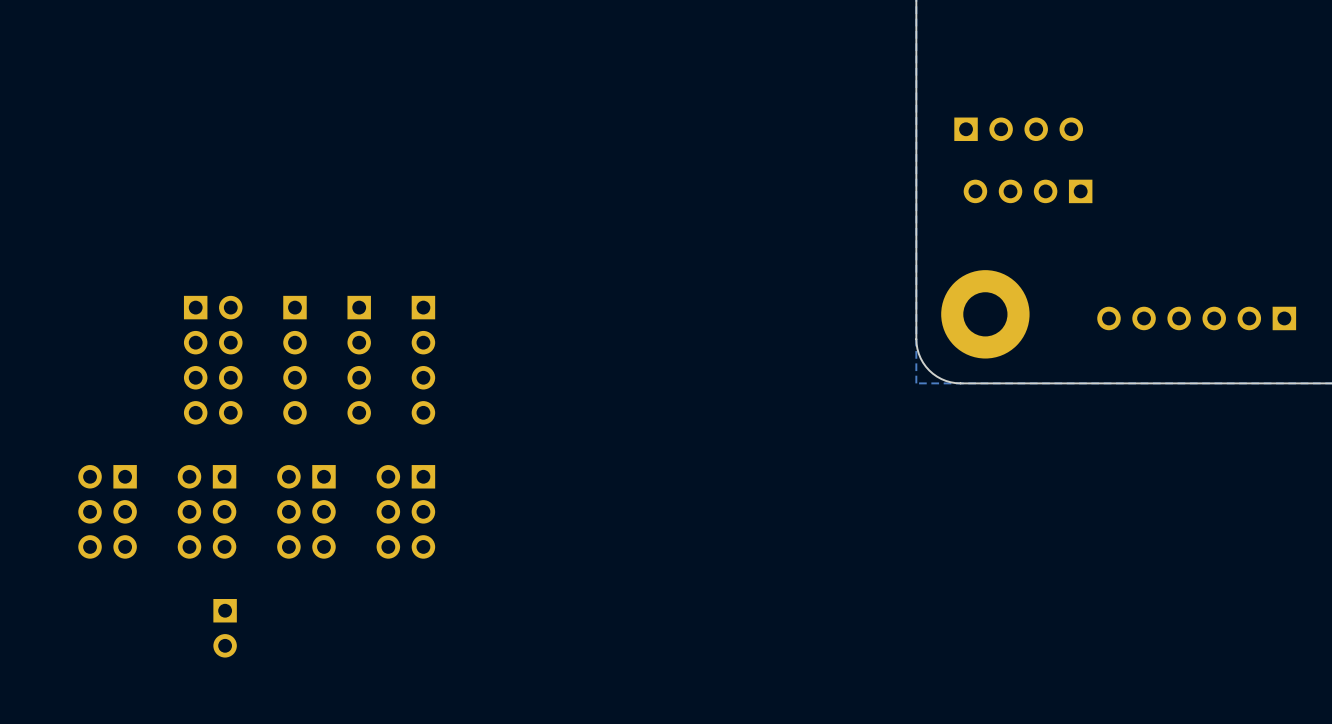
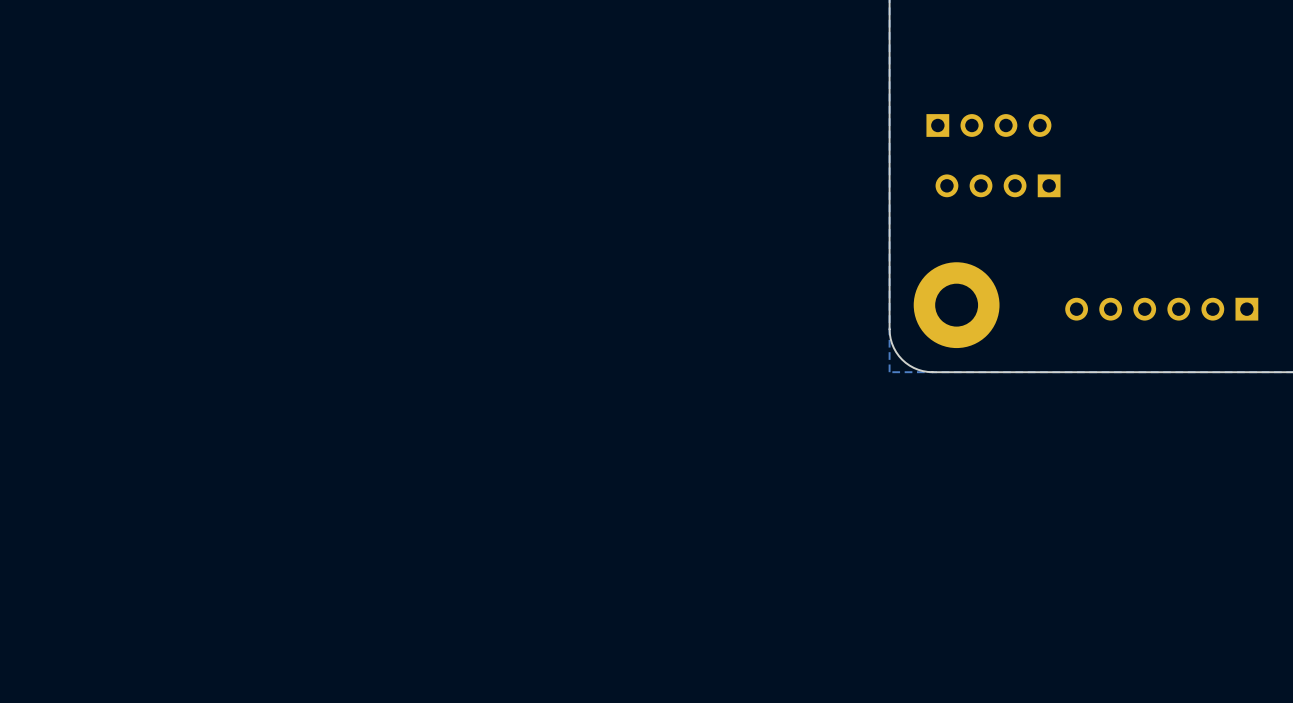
part: (213, 360) -> none
part: (294, 360) -> none
part: (359, 360) -> none
part: (423, 360) -> none
part: (107, 511) -> none
part: (207, 511) -> none
part: (306, 511) -> none
part: (405, 511) -> none
part: (225, 628) -> none

